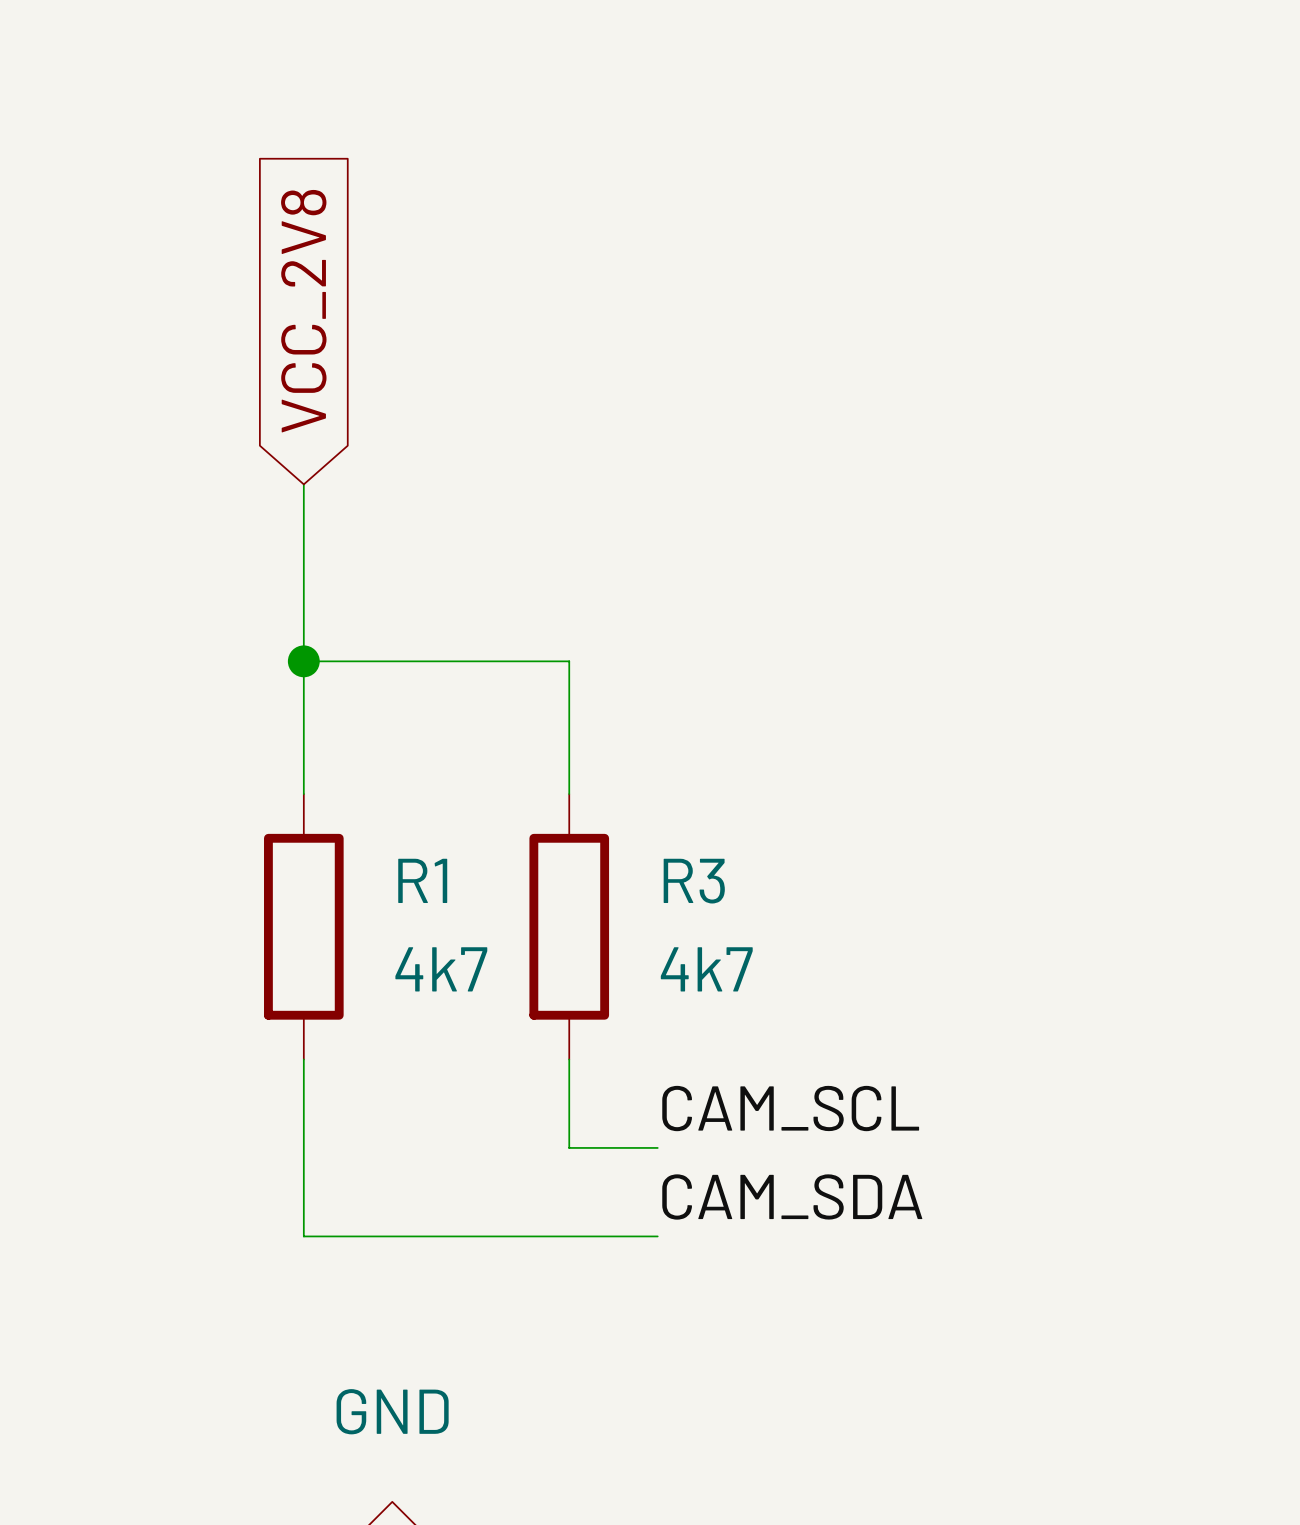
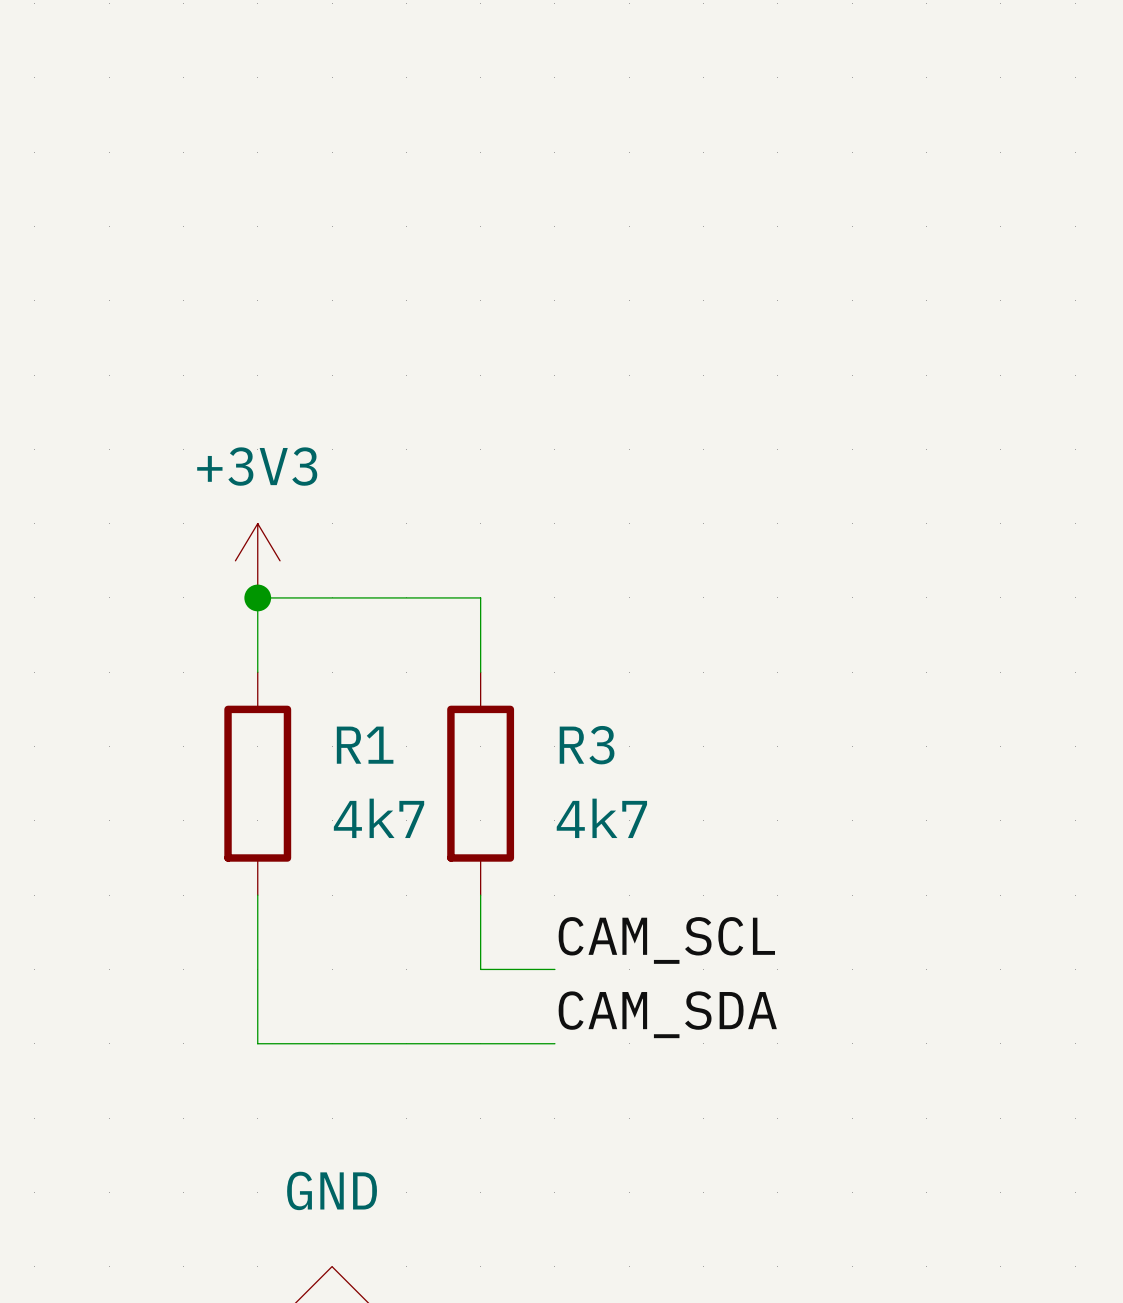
global label: VCC_2V8 (303, 311) -> none
wire: (303, 484) (303, 705) -> none
wire: (303, 661) (569, 661) (569, 705) -> (257, 597) (480, 597)
junction position: (303, 661) -> (257, 597)
power symbol: none -> +3V3 (257, 560)

